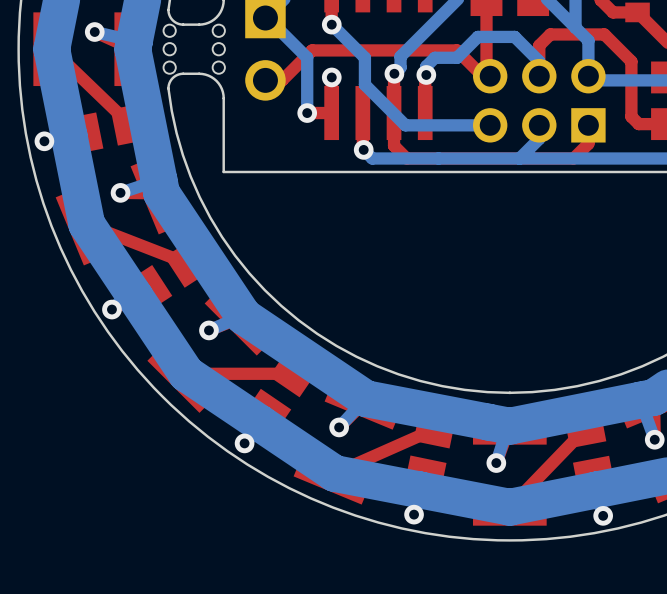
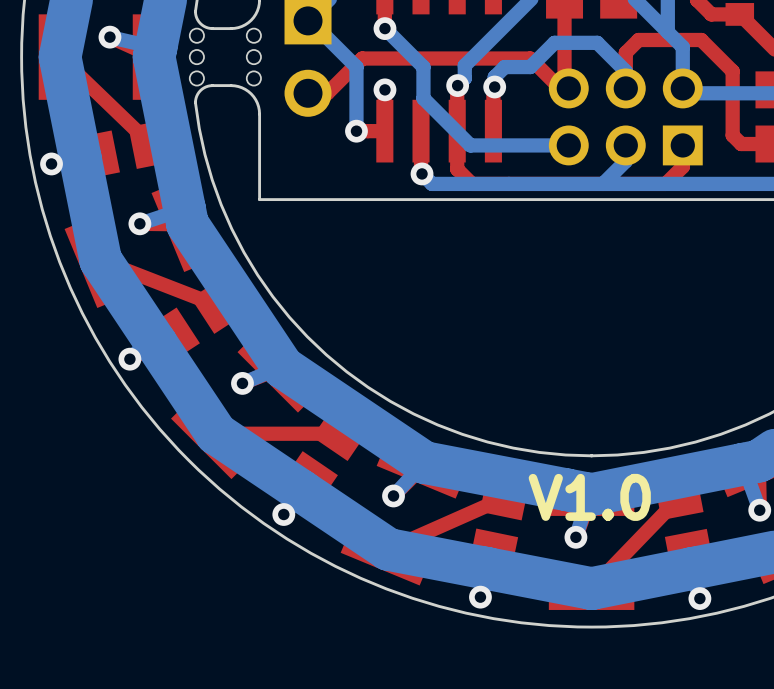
text: none -> V1.0 (589, 497)

